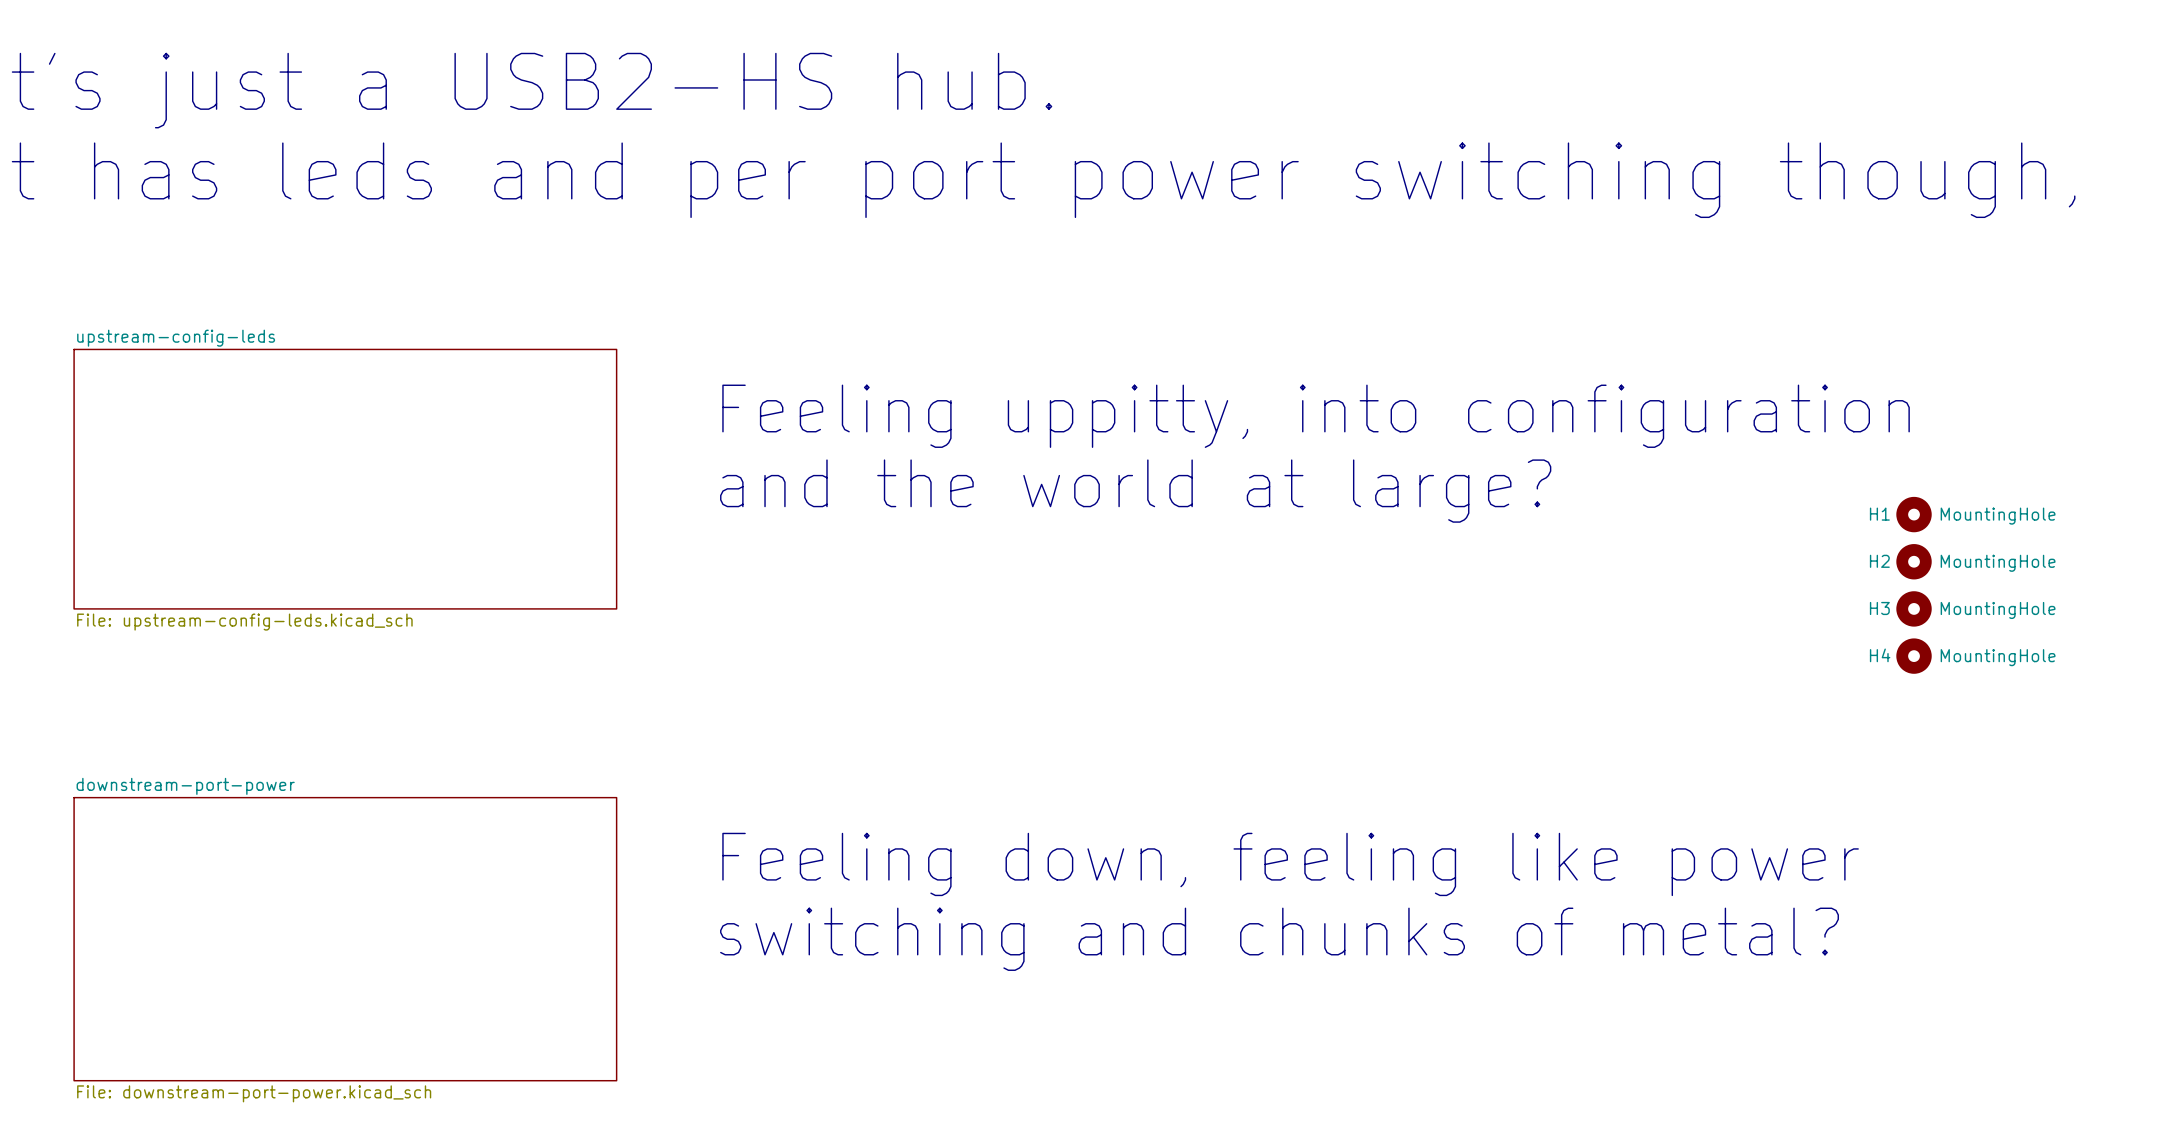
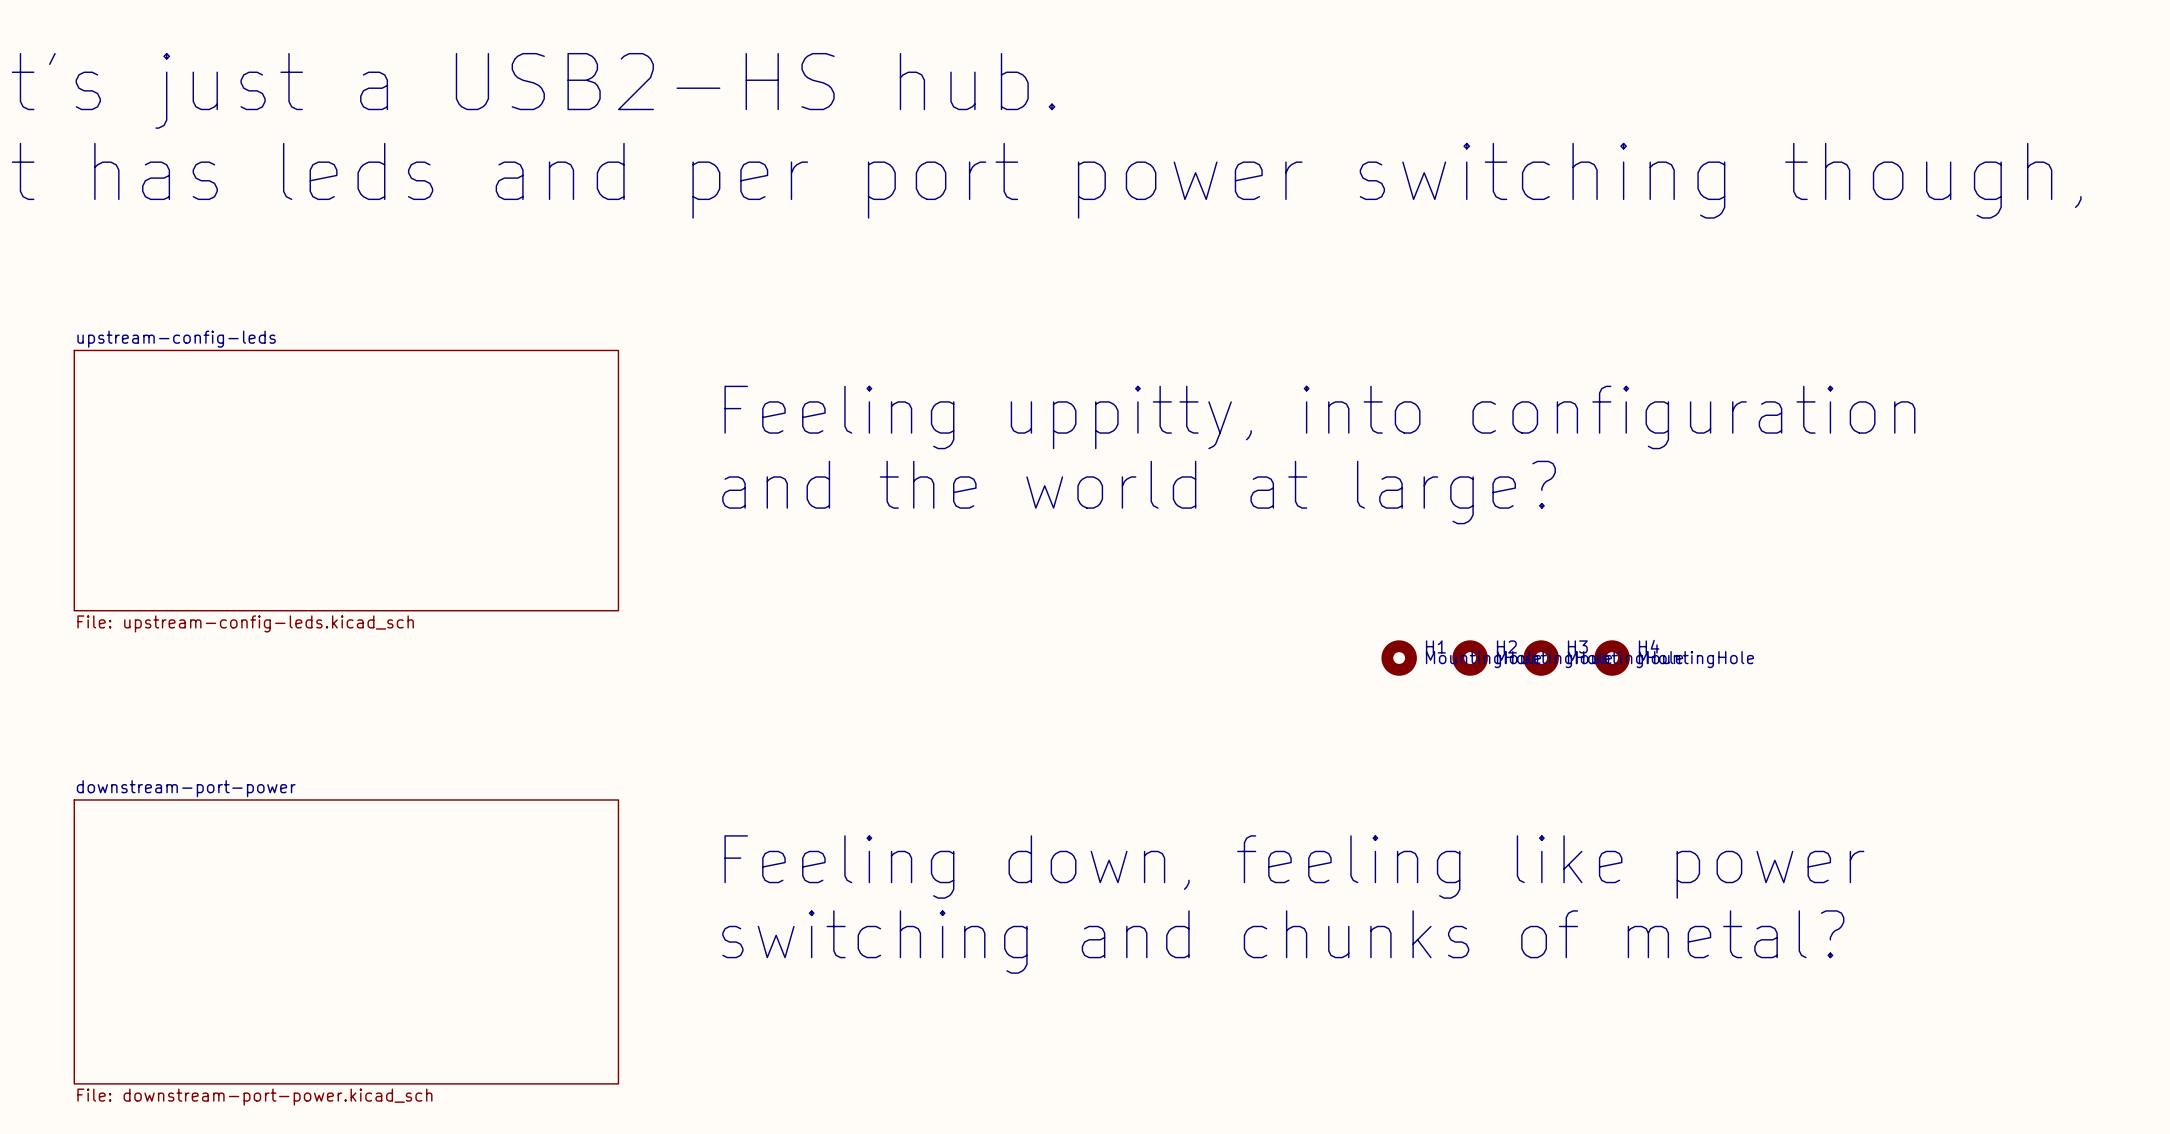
H1 name position: H1 (1879, 514) -> H1 (1435, 646)
H1 position: (1914, 514) -> (1399, 658)
H2 name position: H2 (1879, 561) -> H2 (1506, 646)
H2 position: (1914, 561) -> (1470, 658)
H3 name position: H3 (1879, 608) -> H3 (1577, 646)
H3 position: (1914, 608) -> (1541, 658)
H4 name position: H4 (1880, 655) -> H4 (1649, 646)
H4 position: (1914, 656) -> (1612, 658)

